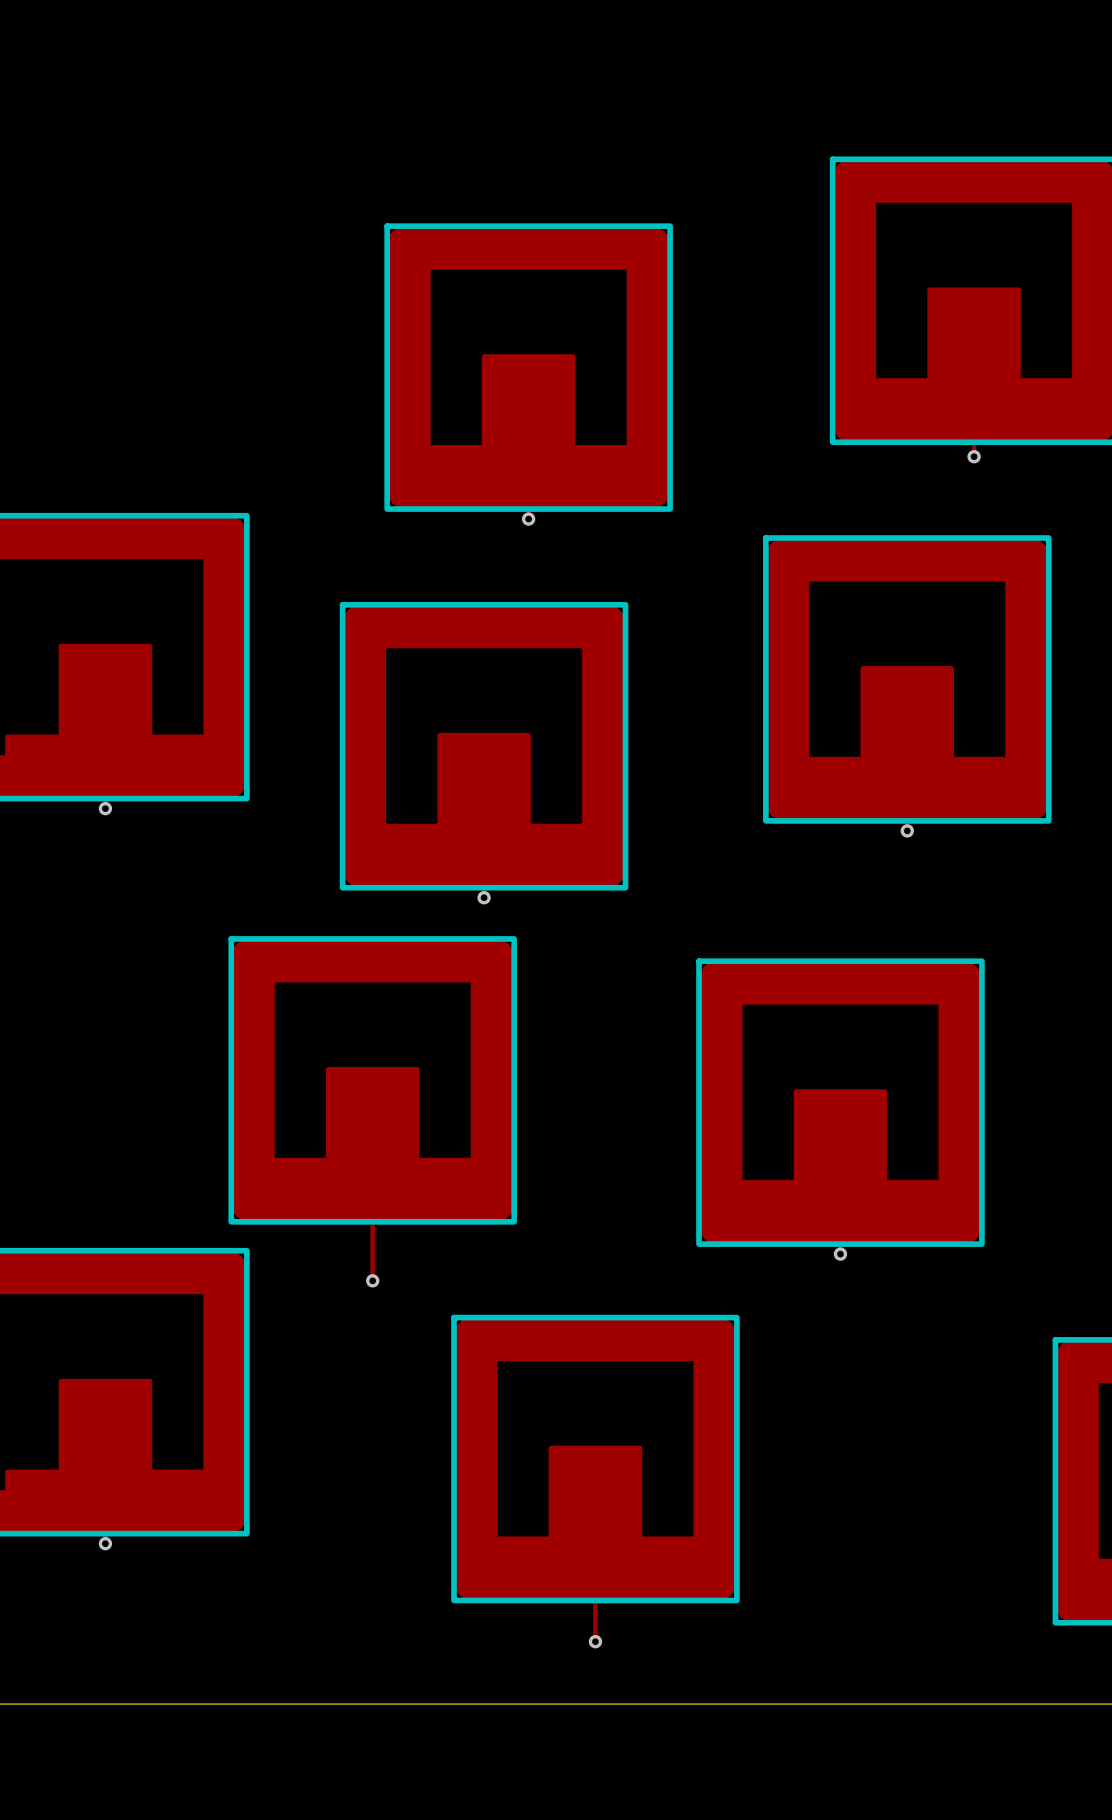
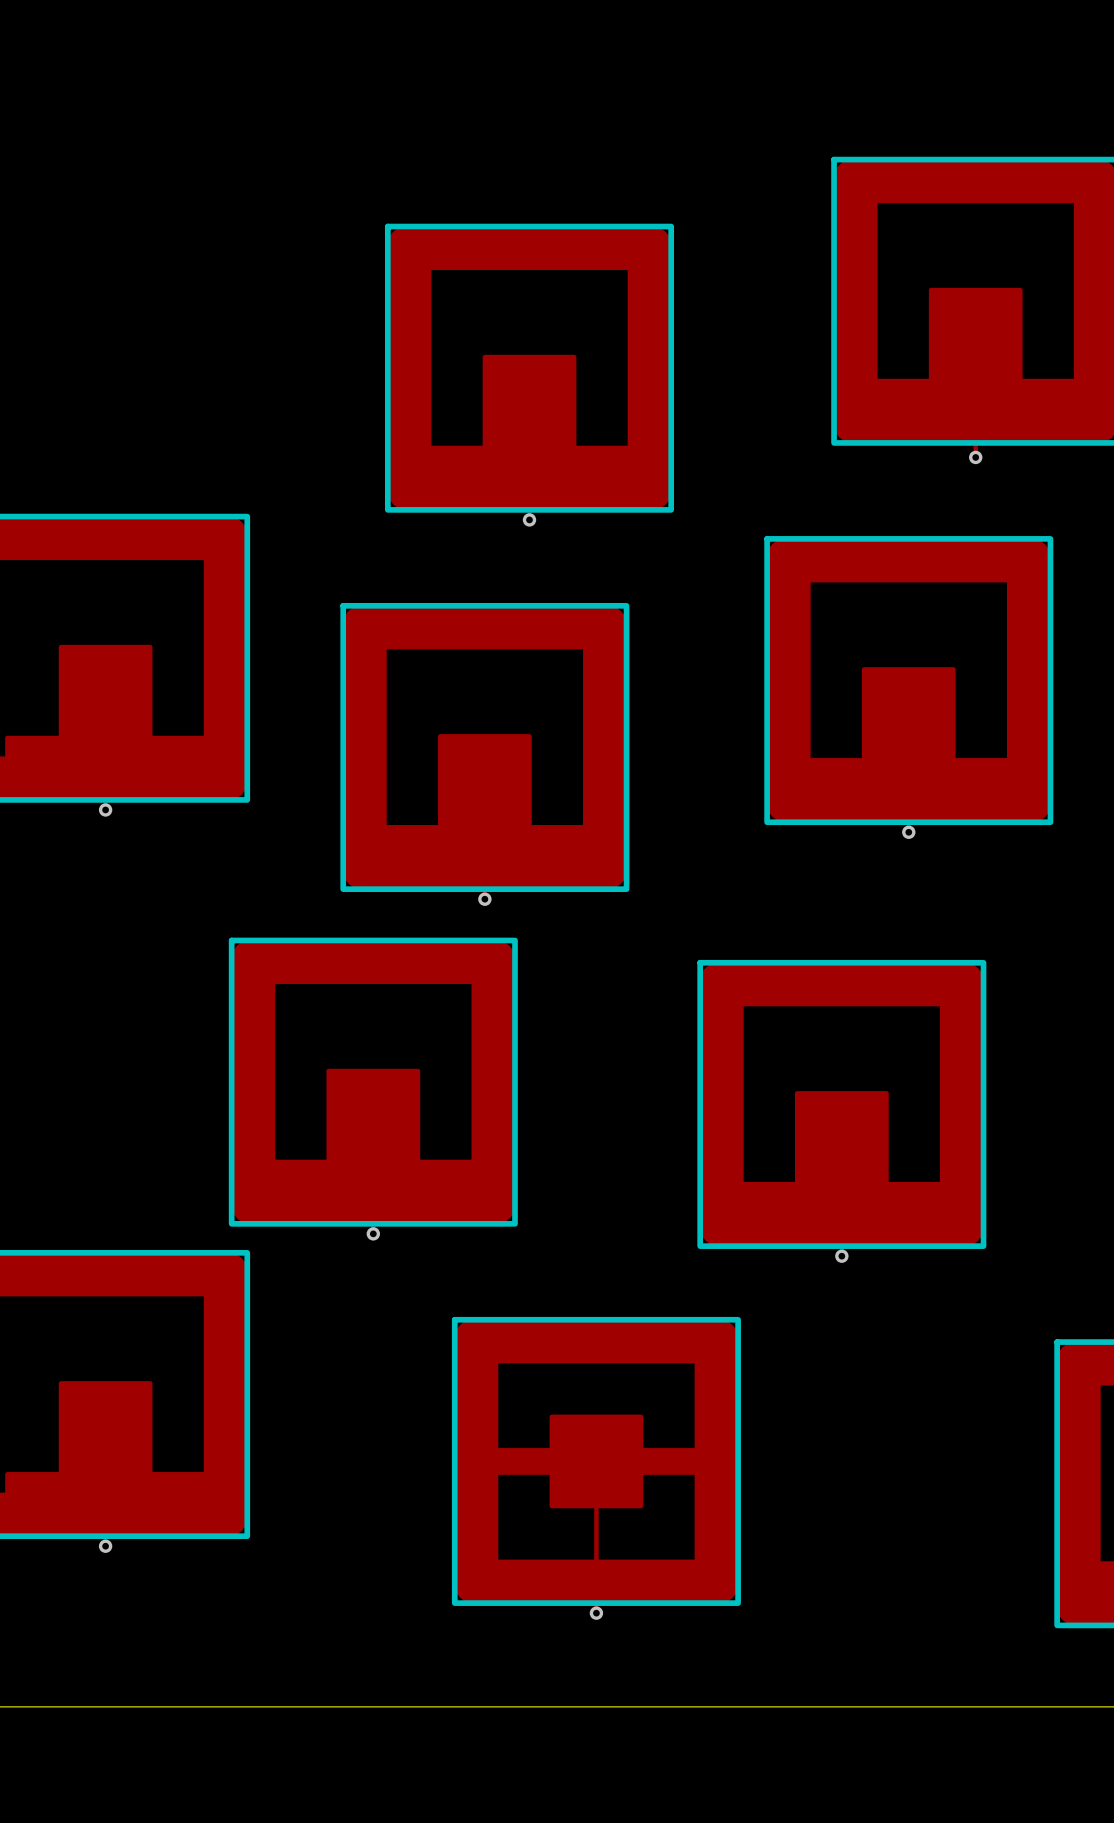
track: (372, 1231) (372, 1280) -> none
via position: (372, 1280) -> (373, 1233)
part footprint: [451, 1314, 740, 1604] -> [451, 1316, 741, 1606]
track: (595, 1610) (595, 1641) -> none
via position: (595, 1641) -> (596, 1613)

